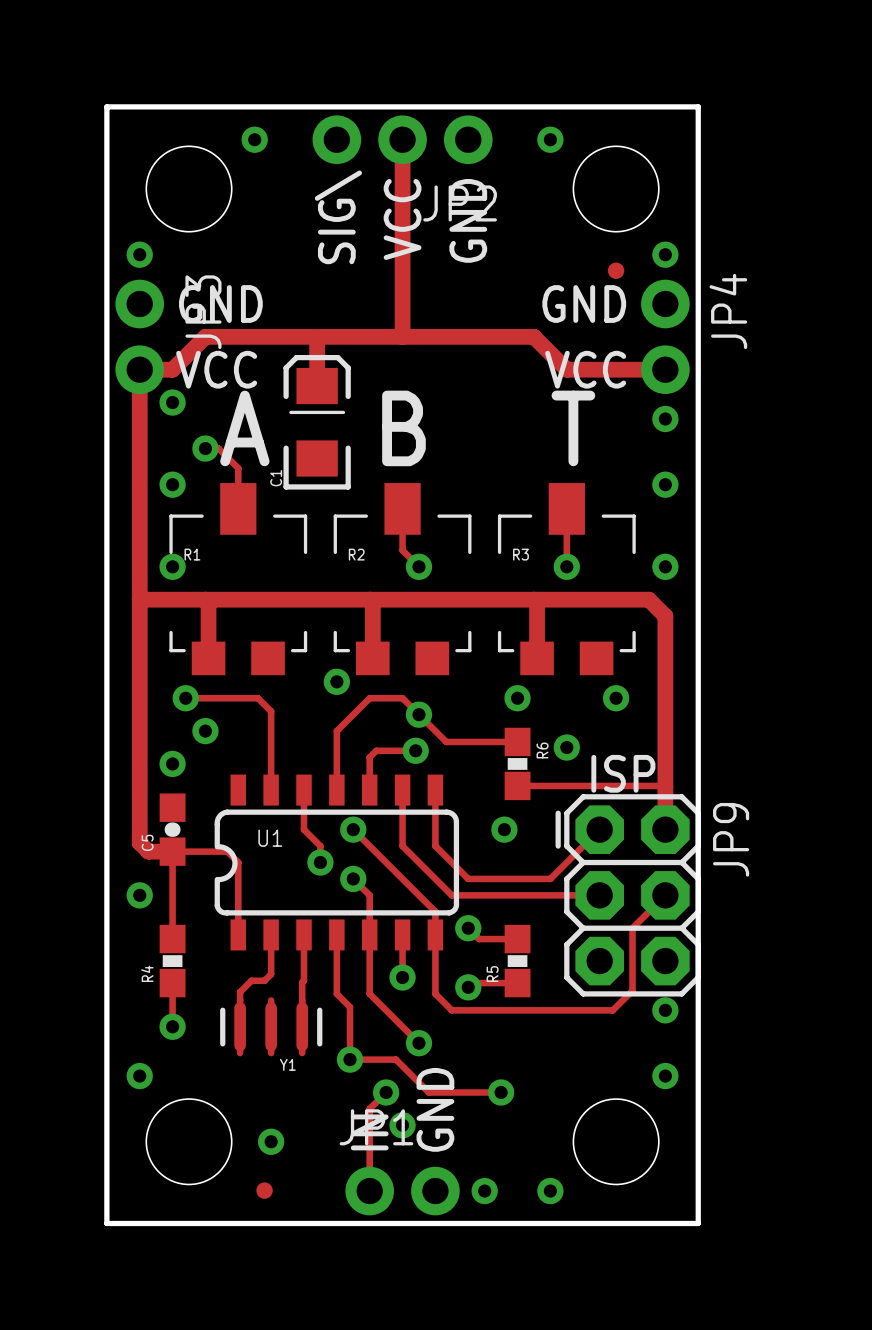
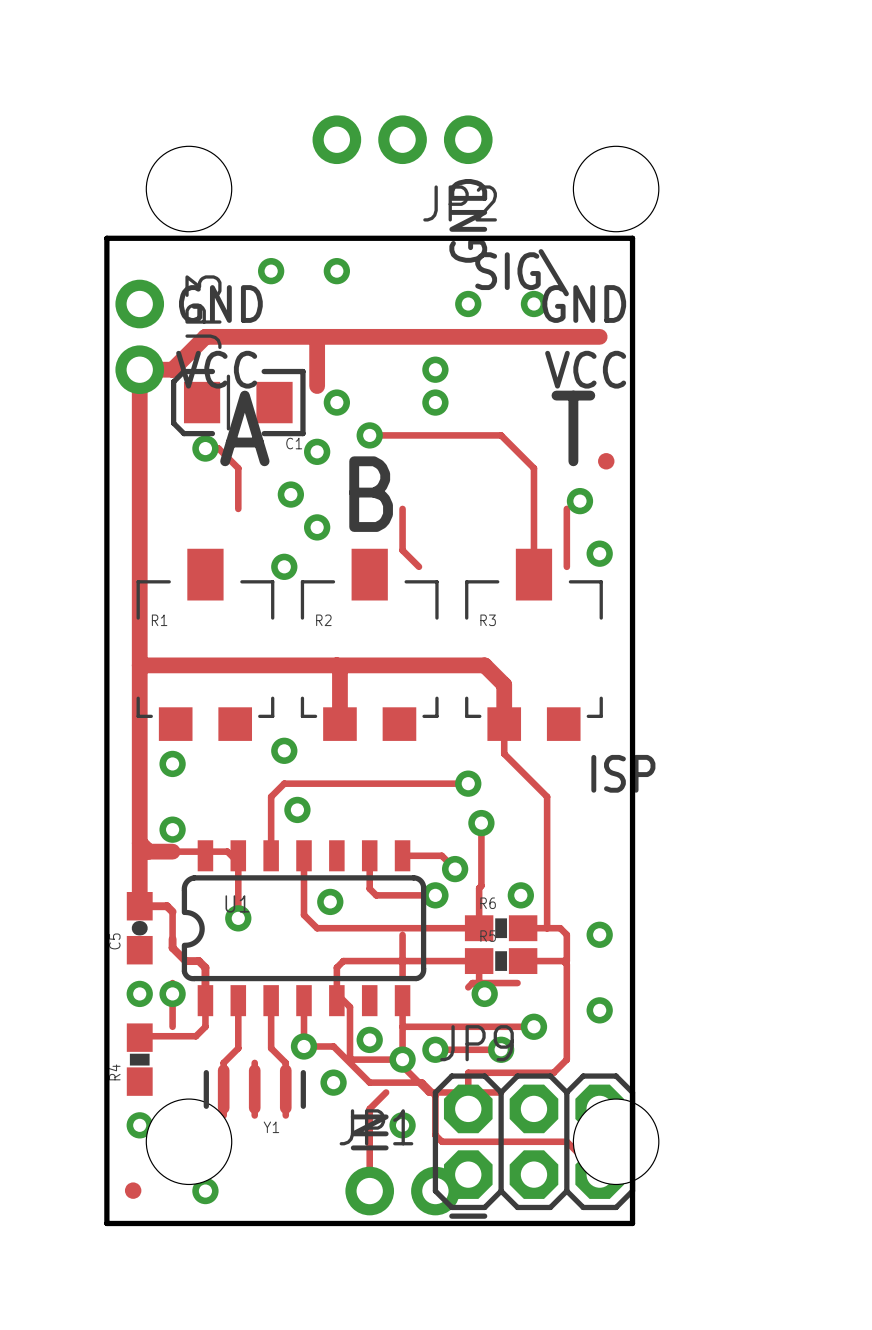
via: (254, 139) -> none
track: (402, 139) (402, 336) -> none
via: (550, 139) -> none
text rotation: 0° (338, 217) -> 90° clockwise (522, 272)
text position: SIG\ (338, 217) -> SIG\ (522, 272)
text: VCC (402, 219) -> none
board edge: (106, 238) (106, 106) (698, 106) (698, 1223) (632, 1223) -> (106, 238) (632, 238) (632, 1223)
via: (139, 254) -> none
via: (665, 254) -> none
part position: (616, 270) -> (606, 461)
via: none -> (271, 271)
via: none -> (336, 271)
via: none -> (468, 304)
via: none -> (533, 304)
track: (533, 336) (566, 369) (665, 369) -> (533, 336) (599, 336)
JP4: (665, 336) -> none
via: none -> (435, 369)
via: (172, 402) -> none
via: none -> (336, 402)
via: none -> (435, 402)
via: (665, 418) -> none
C1 rotation: 0° (317, 422) -> 90° counterclockwise (238, 402)
C1 position: (317, 422) -> (238, 402)
text position: B (403, 428) -> B (371, 494)
track: none -> (369, 435) (501, 435) (533, 468) (533, 574)
via: none -> (369, 435)
via: none -> (317, 451)
via: (172, 484) -> none
via: (665, 484) -> none
via: none -> (290, 494)
via: none -> (579, 501)
via: none -> (317, 527)
via: none -> (599, 553)
via: (172, 566) -> none
via: none -> (284, 566)
via: (418, 566) -> none
via: (566, 566) -> none
via: (665, 566) -> none
R1 position: (238, 579) -> (205, 644)
R2 position: (402, 579) -> (369, 644)
R3 position: (566, 579) -> (533, 644)
track: (139, 599) (648, 599) (665, 616) (665, 829) -> none
track: (205, 599) (208, 602) (208, 658) -> none
track: (369, 599) (372, 602) (372, 658) -> (336, 665) (339, 668) (339, 724)
track: (533, 599) (537, 602) (537, 658) -> none
track: none -> (139, 665) (484, 665) (504, 684) (504, 753) (547, 796) (547, 928)
via: (336, 681) -> none
track: (185, 698) (258, 698) (271, 711) (271, 790) -> none
via: (185, 698) -> none
via: (517, 698) -> none
via: (616, 698) -> none
via: (418, 714) -> none
via: (205, 731) -> none
track: (517, 741) (446, 741) (402, 698) (369, 698) (336, 731) (336, 790) -> none
via: (566, 747) -> none
via: none -> (284, 750)
track: (415, 750) (376, 750) (369, 757) (369, 790) -> none
via: (415, 750) -> none
R6 rotation: 0° (517, 763) -> 90° clockwise (501, 928)
R6 position: (517, 763) -> (501, 928)
track: none -> (468, 783) (284, 783) (271, 796) (271, 855)
via: none -> (468, 783)
track: (517, 785) (665, 786) -> none
track: (304, 790) (304, 829) (320, 846) (320, 862) -> none
track: (402, 790) (402, 846) (451, 895) (599, 895) -> none
track: (435, 790) (435, 846) (468, 878) (550, 878) (599, 829) -> none
via: none -> (297, 809)
track: none -> (481, 823) (479, 928) (317, 928) (304, 915) (304, 855)
C5 position: (172, 829) -> (139, 928)
via: none -> (172, 829)
track: (353, 829) (435, 911) (435, 993) (451, 1010) (612, 1010) (632, 990) (632, 928) (665, 895) -> none
via: (353, 829) -> none
via position: (504, 829) -> (481, 823)
track: (172, 851) (172, 911) -> (139, 842) (139, 906) (167, 906) (172, 911)
track: none -> (369, 855) (369, 888) (376, 895) (435, 895)
track: none -> (402, 855) (441, 855) (455, 869)
via: (320, 862) -> none
U1 position: (336, 862) -> (304, 928)
via: none -> (455, 869)
track: (353, 878) (369, 895) (369, 993) (418, 1043) -> none
via: (353, 878) -> none
via: (139, 895) -> none
via: none -> (435, 895)
via: none -> (520, 895)
JP9 rotation: 0° (628, 895) -> 90° counterclockwise (533, 1146)
JP9 position: (628, 895) -> (533, 1146)
via: none -> (330, 901)
via: none -> (238, 918)
track: (468, 928) (479, 939) (517, 939) -> none
via: (468, 928) -> none
track: none -> (523, 928) (560, 928) (566, 934) (566, 961) (523, 961)
track: (271, 934) (271, 974) (264, 980) (251, 980) (240, 992) (240, 1000) -> none
track: (304, 934) (302, 1000) -> none
track: (336, 934) (336, 967) -> (484, 993) (479, 988) (479, 961) (343, 961) (336, 967)
via: none -> (599, 934)
track: none -> (172, 939) (172, 947) (185, 961) (198, 961) (205, 967) (205, 1026) (195, 1036) (139, 1037)
R4 position: (172, 961) -> (139, 1059)
R5 rotation: 0° (517, 961) -> 90° clockwise (501, 961)
track: none -> (563, 961) (566, 964) (566, 1059) (553, 1072) (468, 1072) (468, 1108)
via: (402, 977) -> none
via position: (468, 987) -> (484, 993)
via: none -> (139, 993)
via: none -> (172, 993)
track: none -> (238, 1000) (238, 1048) (223, 1062)
track: none -> (271, 1000) (271, 1048) (285, 1062)
track: none -> (304, 1000) (304, 1046) (333, 1046) (369, 1082) (422, 1082) (435, 1095) (435, 1135) (441, 1141) (566, 1141) (599, 1174)
track: none -> (402, 1000) (402, 1059)
via: none -> (599, 1010)
via: (665, 1010) -> none
via: (172, 1026) -> none
Y1 position: (271, 1026) -> (254, 1089)
track: none -> (402, 1026) (533, 1026)
via: none -> (533, 1026)
via: none -> (369, 1039)
via: (418, 1043) -> none
via: none -> (304, 1046)
track: none -> (435, 1049) (501, 1049)
via: none -> (435, 1049)
via: none -> (501, 1049)
via: (349, 1059) -> none
via: none -> (402, 1059)
via: (139, 1076) -> none
via: (665, 1076) -> none
via: none -> (333, 1082)
via: (386, 1092) -> none
via: (501, 1092) -> none
text: GND (435, 1109) -> none
via: none -> (139, 1125)
via: (271, 1141) -> none
part position: (264, 1190) -> (133, 1190)
via: none -> (205, 1191)
via: (484, 1191) -> none
via: (550, 1191) -> none

